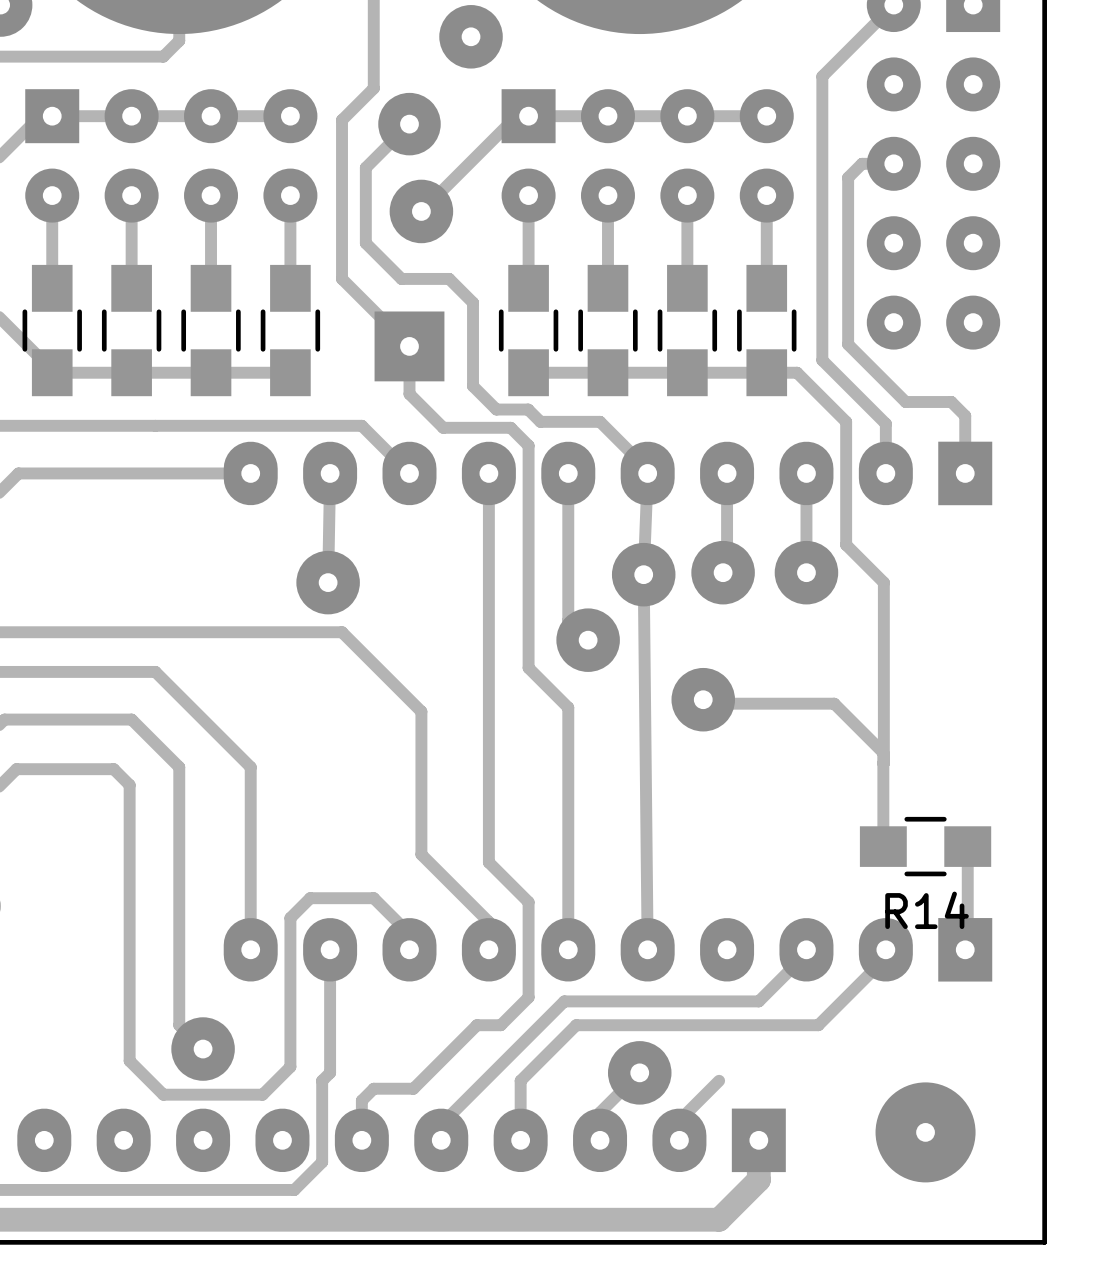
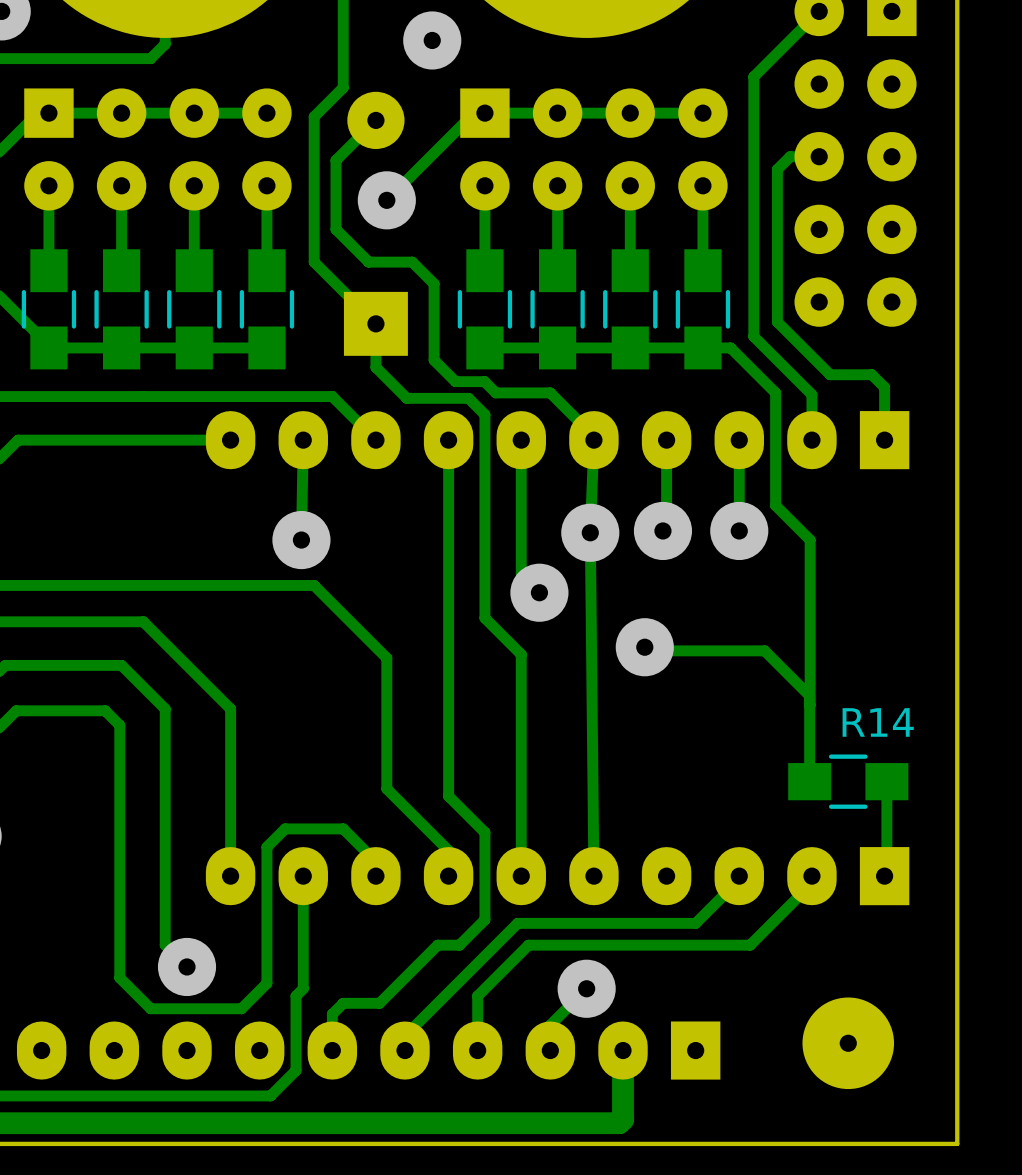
R14 name position: R14 (927, 910) -> R14 (878, 722)
track: (719, 1080) (679, 1120) -> none
track: (758, 1140) (758, 1180) (719, 1219) (675, 1219) -> (623, 1050) (623, 1119) (619, 1123)

